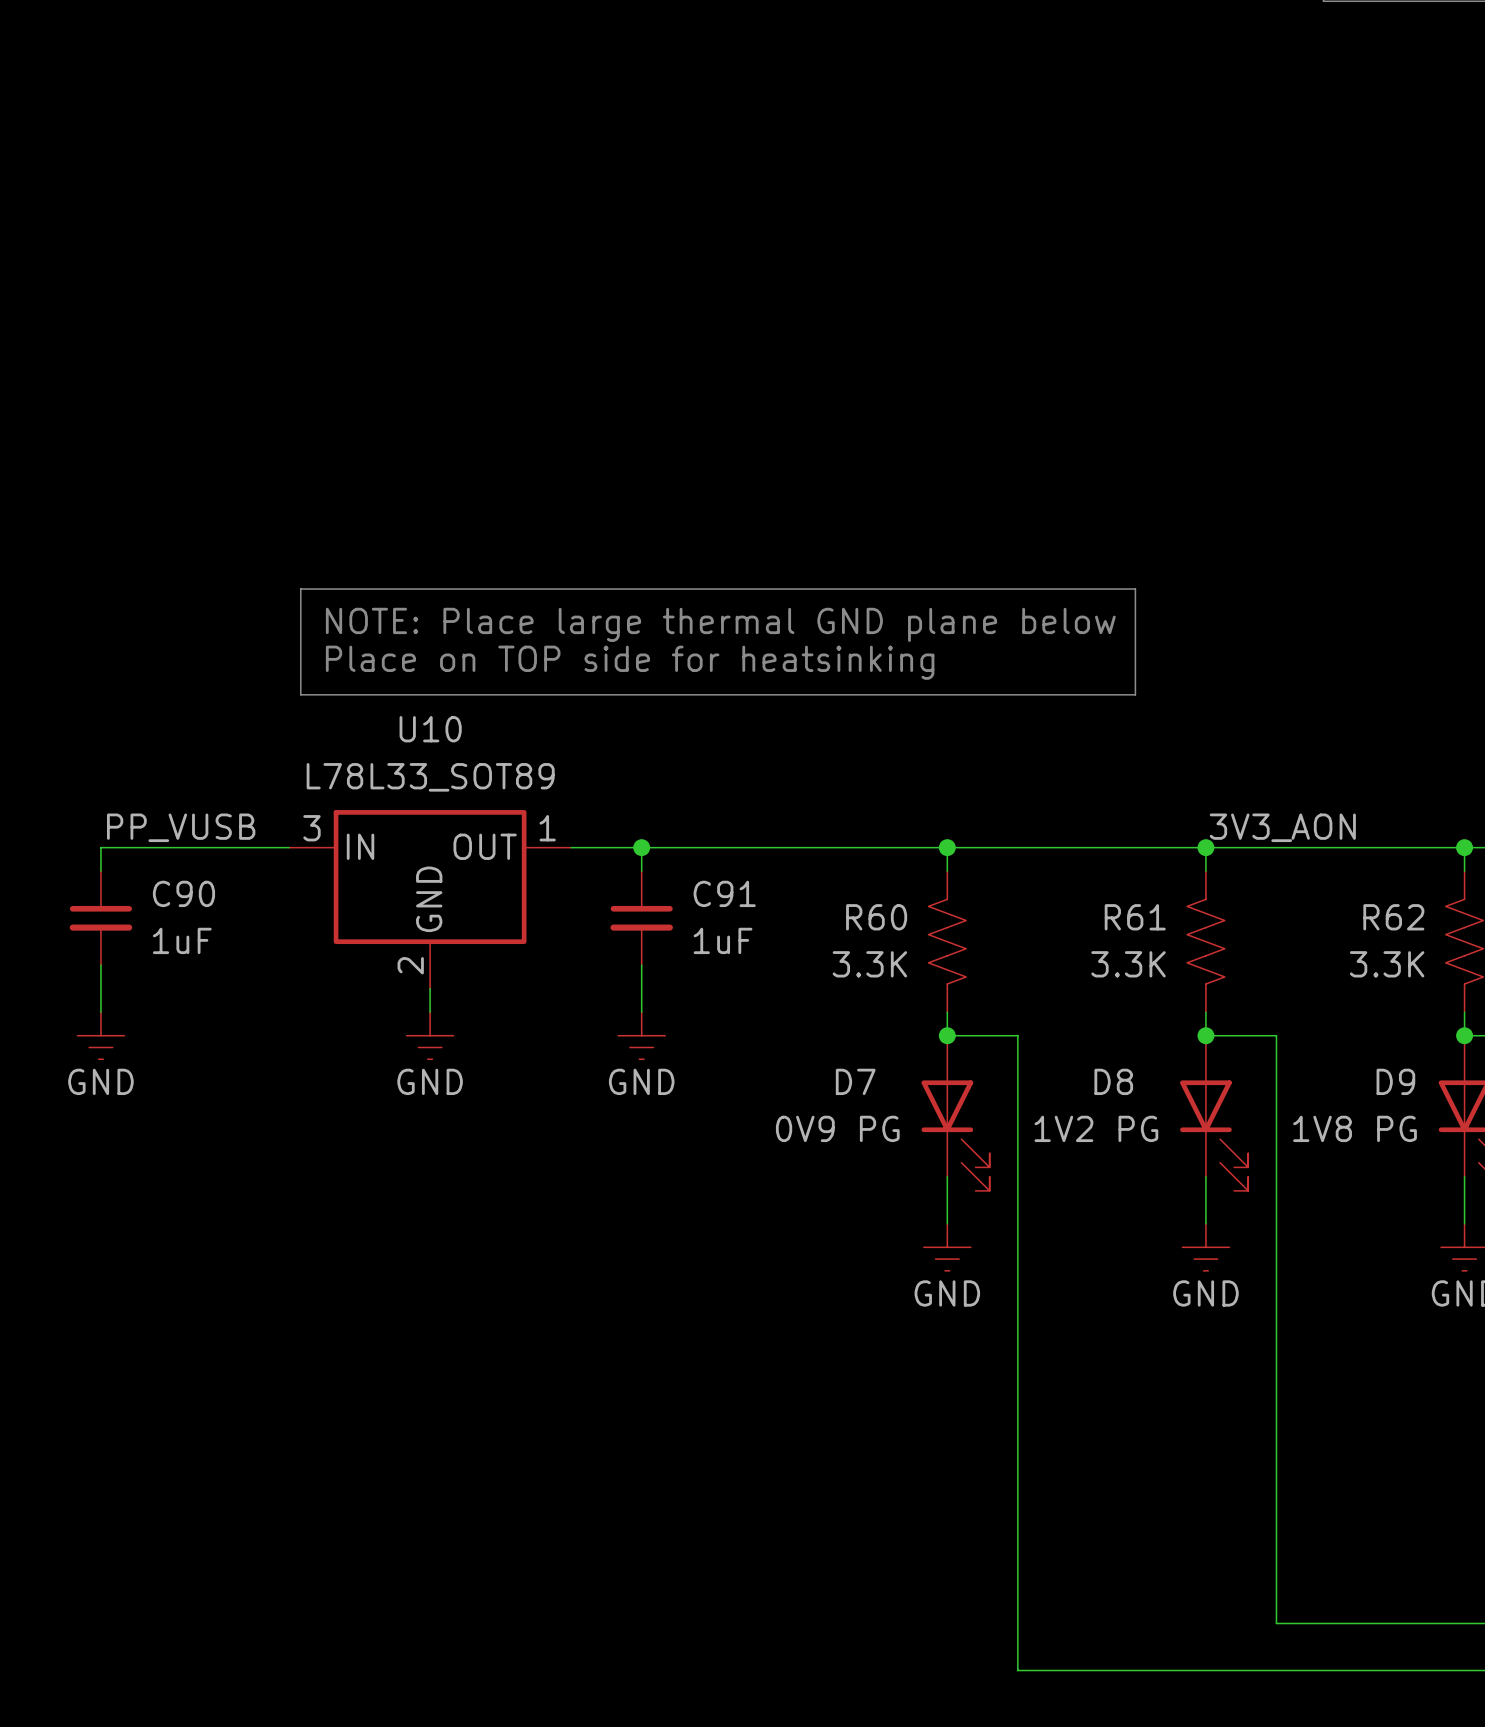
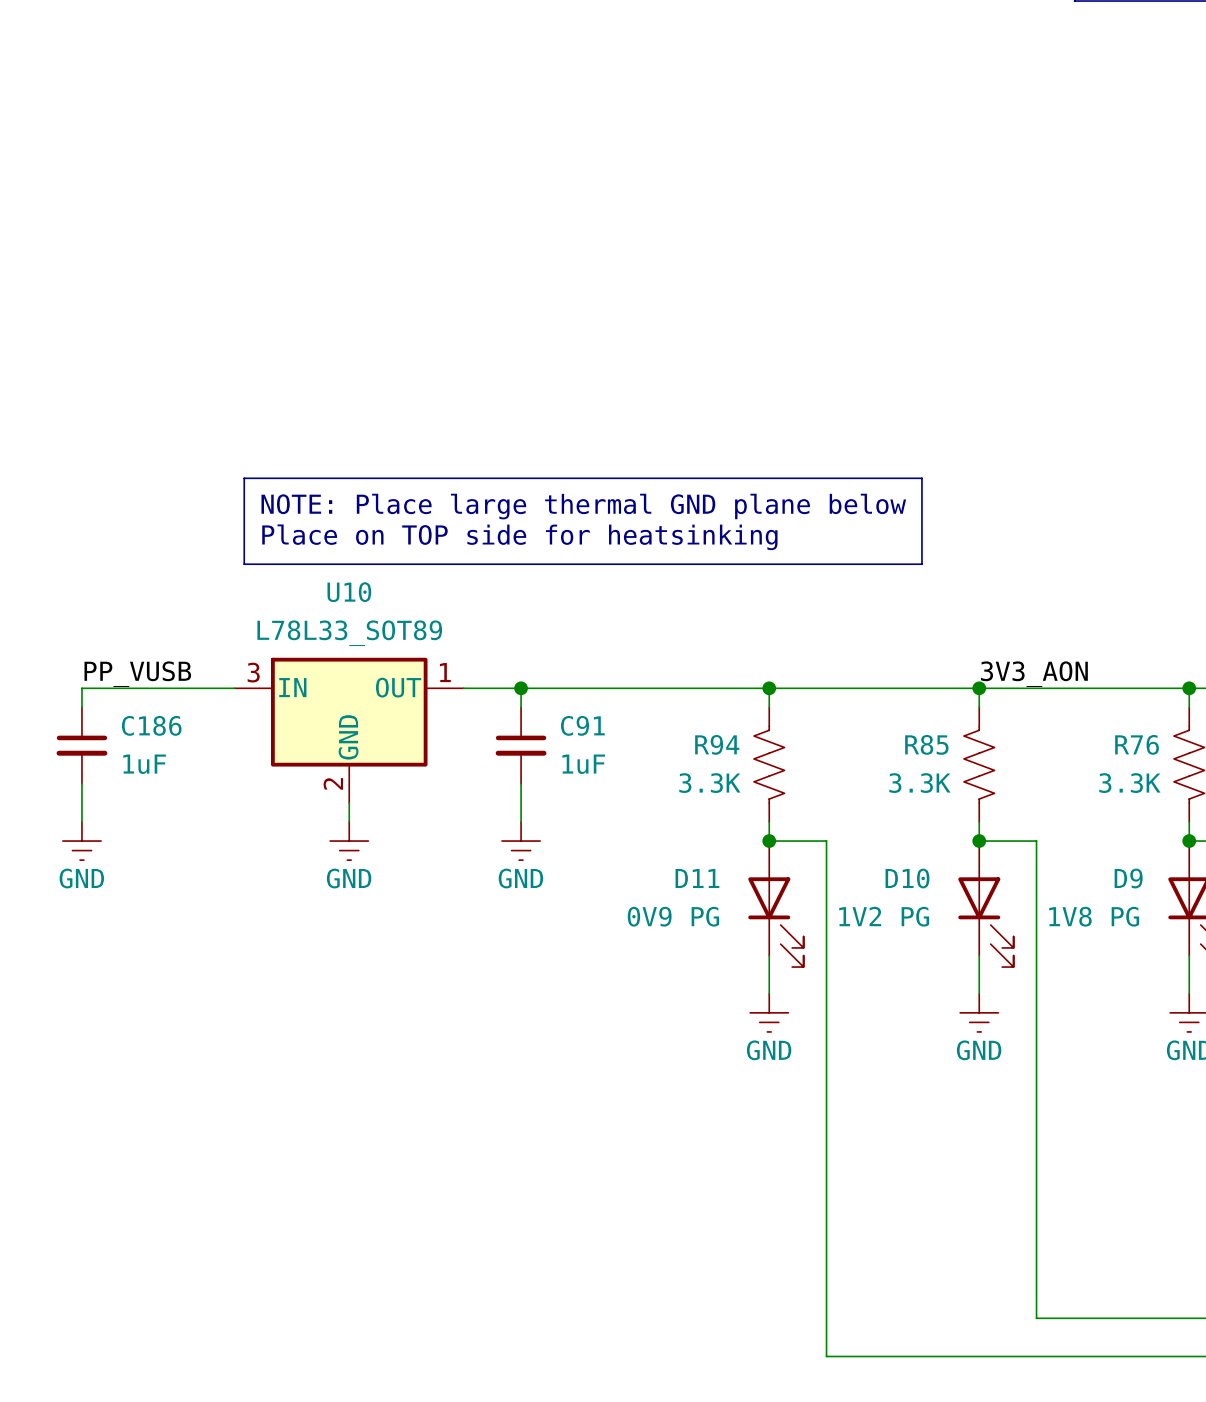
C90 name: C90 (183, 893) -> C186 (151, 725)
R60 name: R60 (876, 917) -> R94 (717, 744)
R61 name: R61 (1135, 917) -> R85 (926, 744)
R62 name: R62 (1393, 917) -> R76 (1137, 744)
D7 name: D7 (855, 1081) -> D11 (697, 878)
D8 name: D8 (1113, 1081) -> D10 (907, 878)

